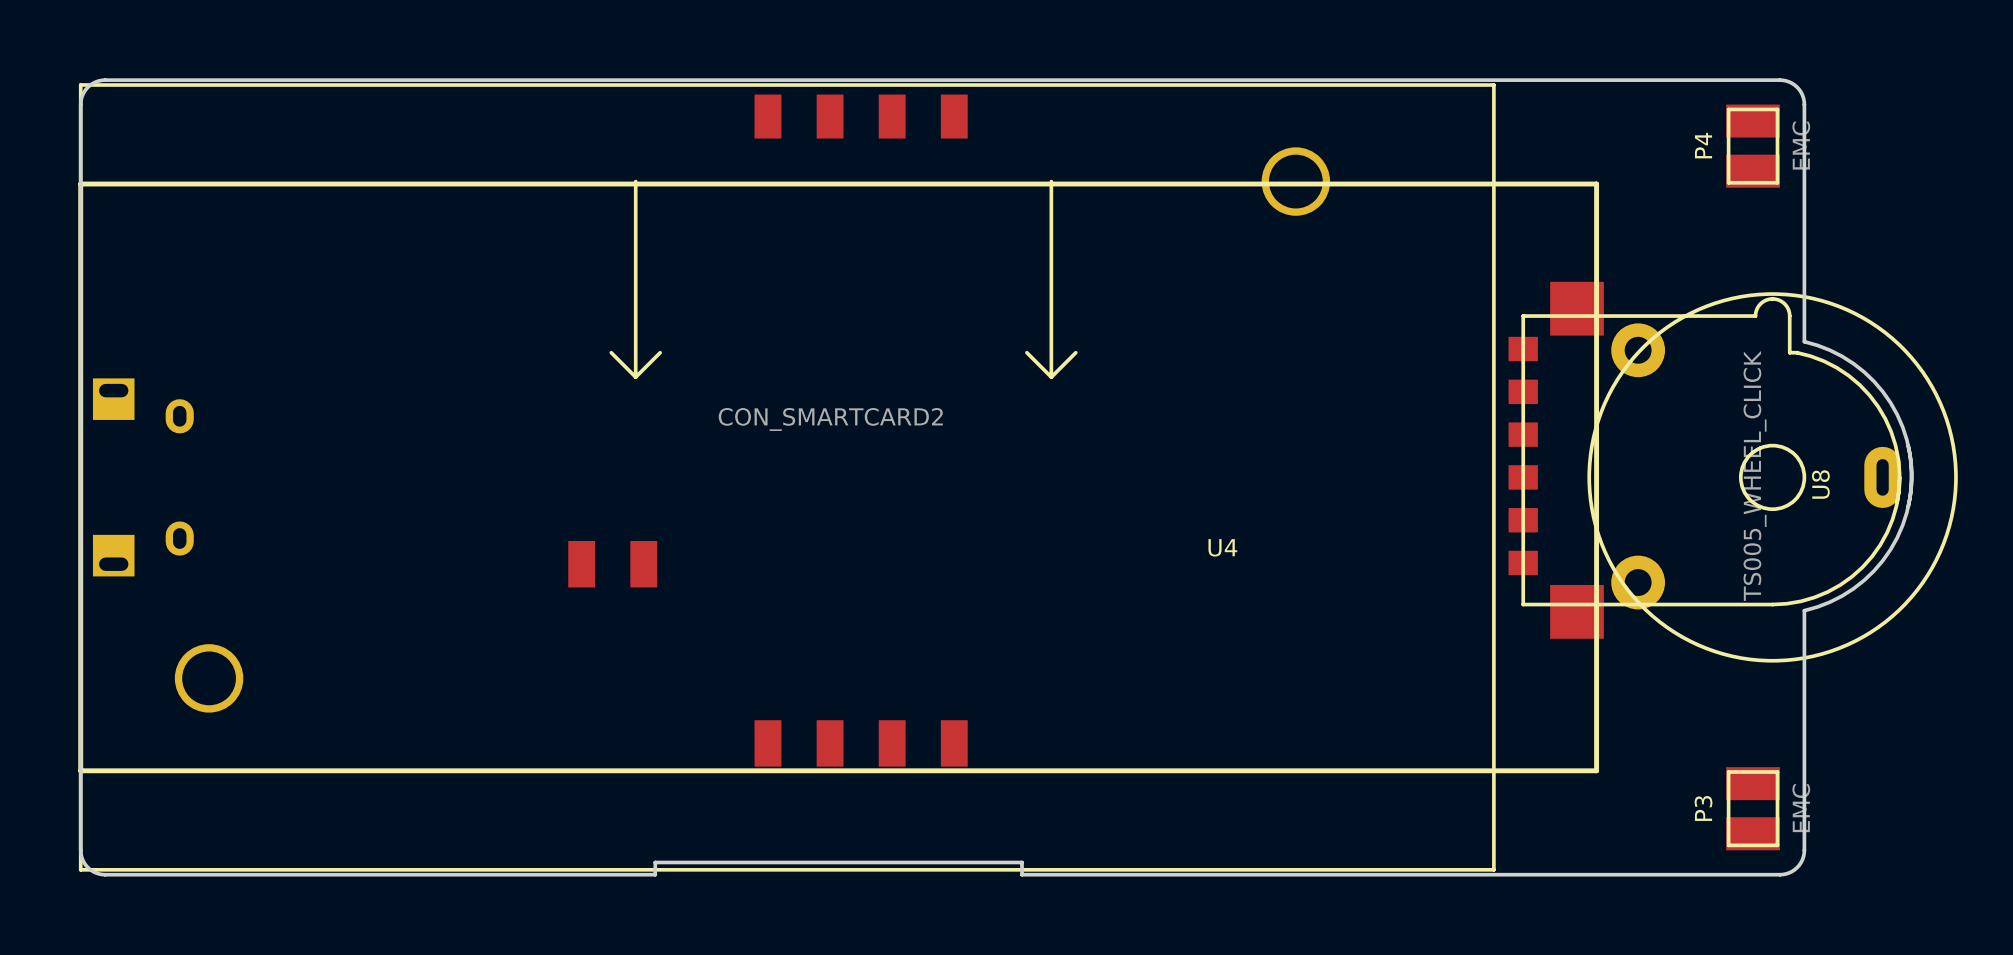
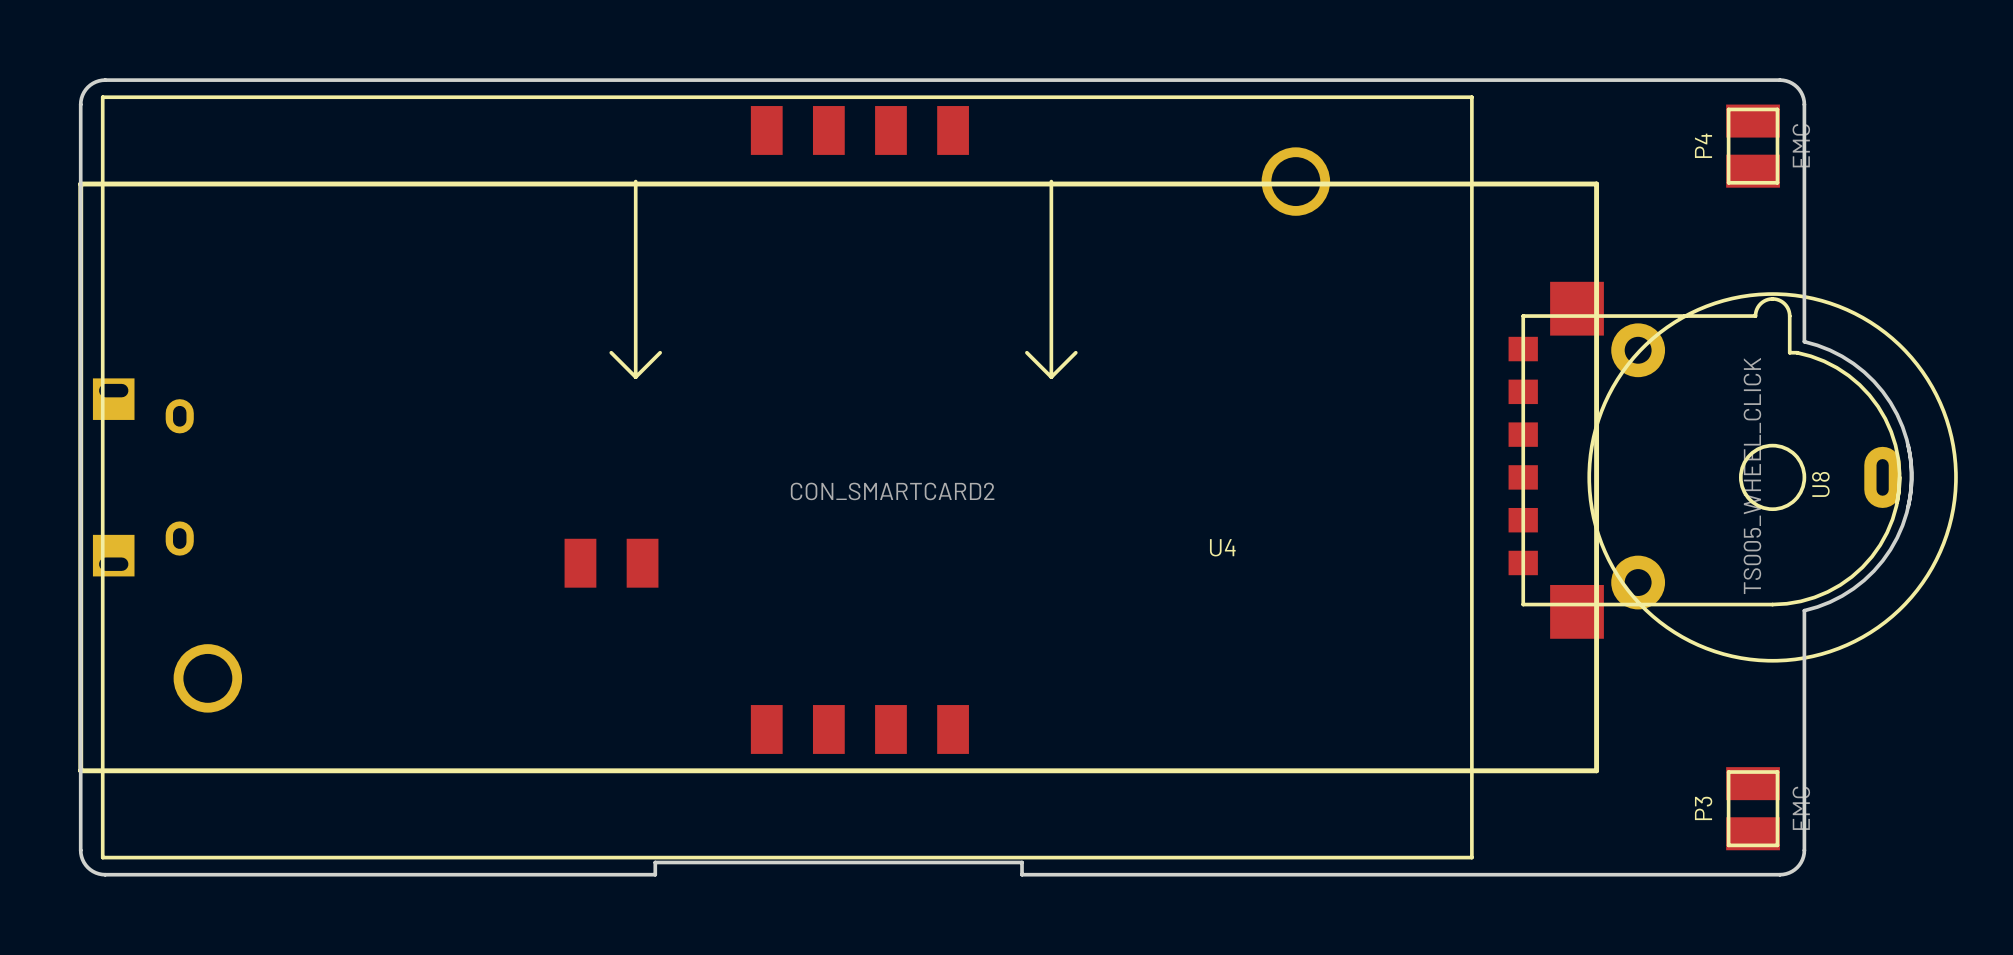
U4 footprint: [78, 83, 1496, 872] -> [100, 95, 1474, 860]
U4 value position: CON_SMARTCARD2 (830, 419) -> CON_SMARTCARD2 (892, 491)

